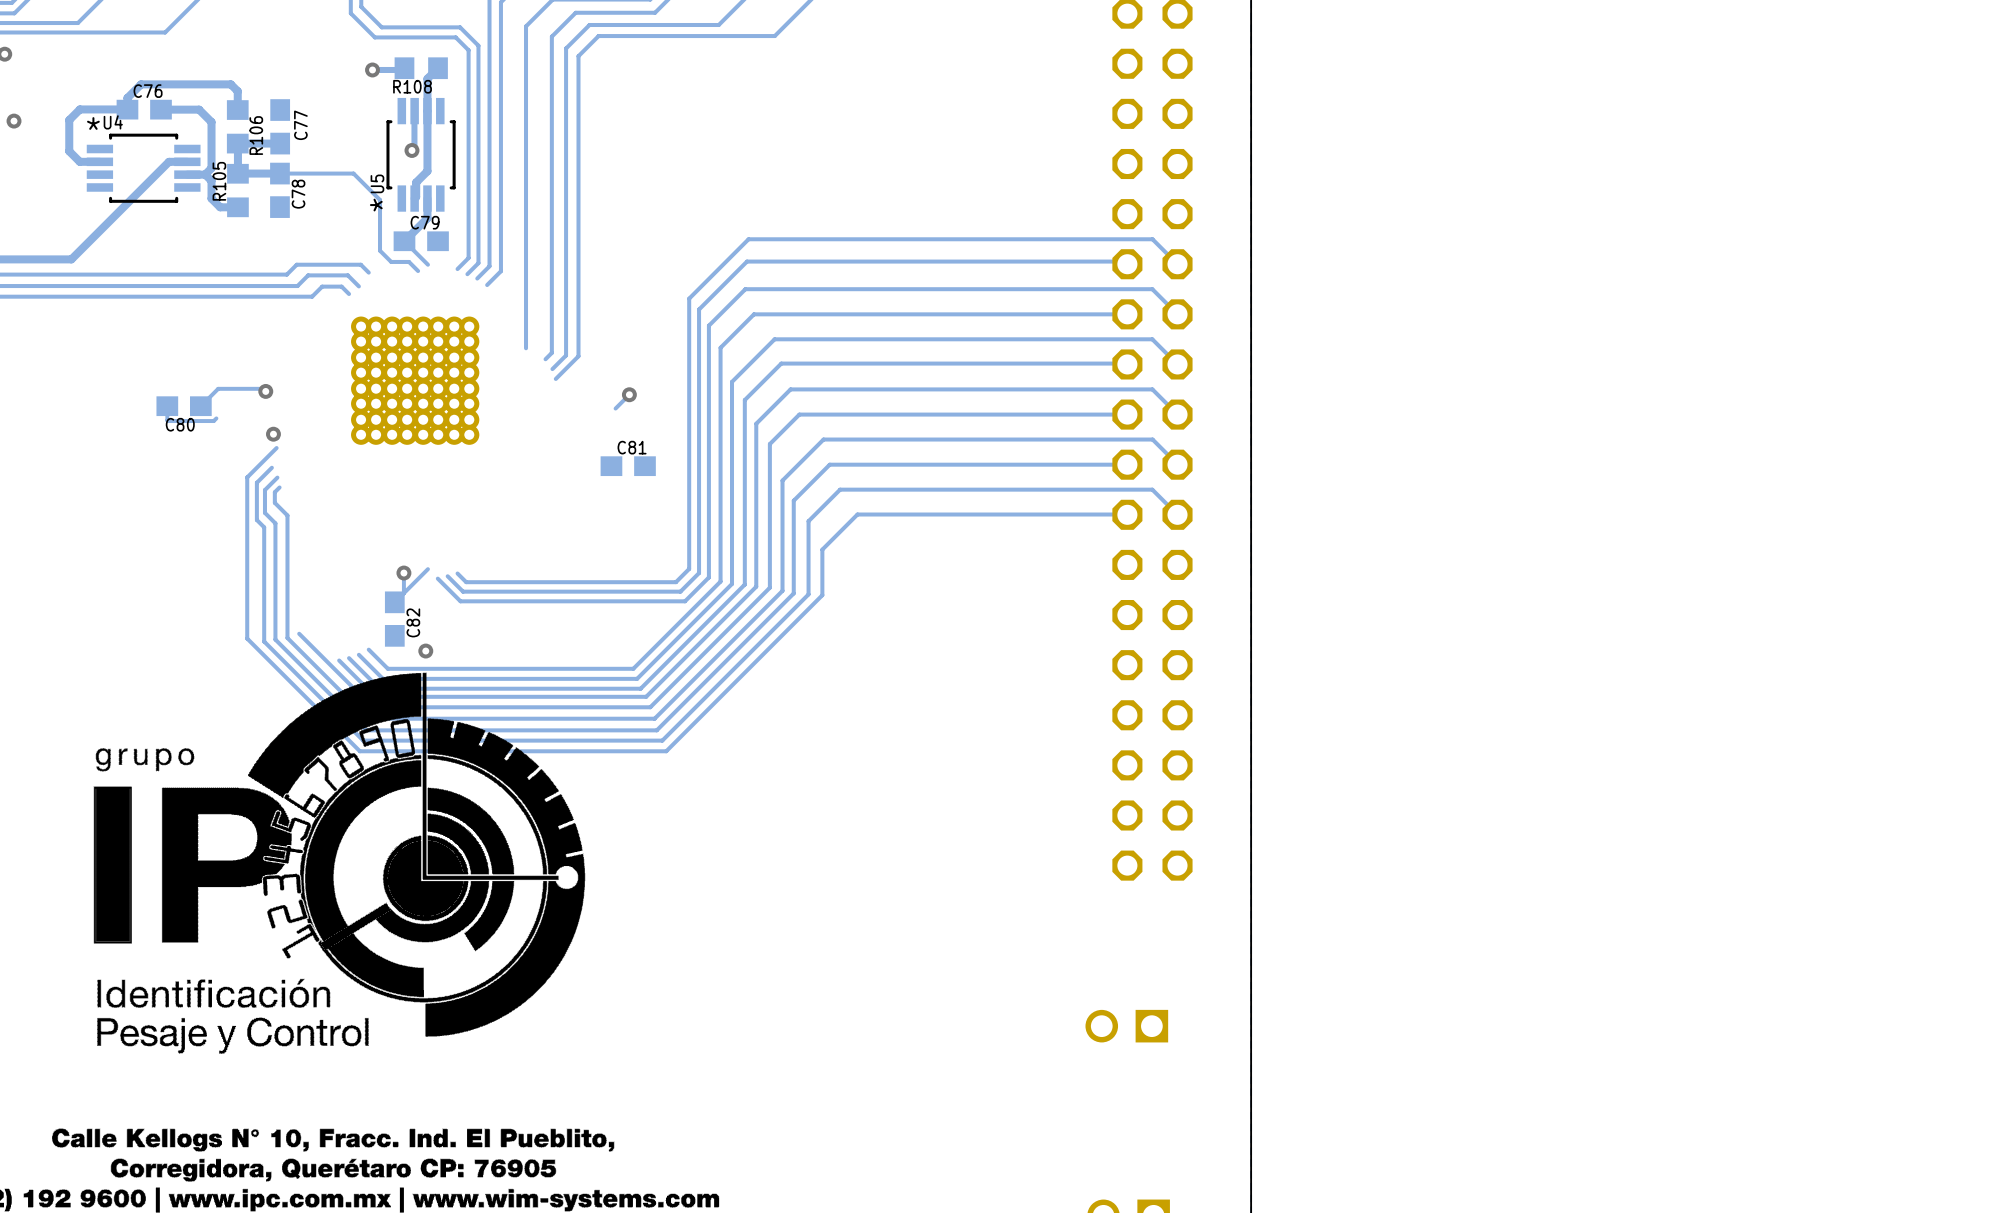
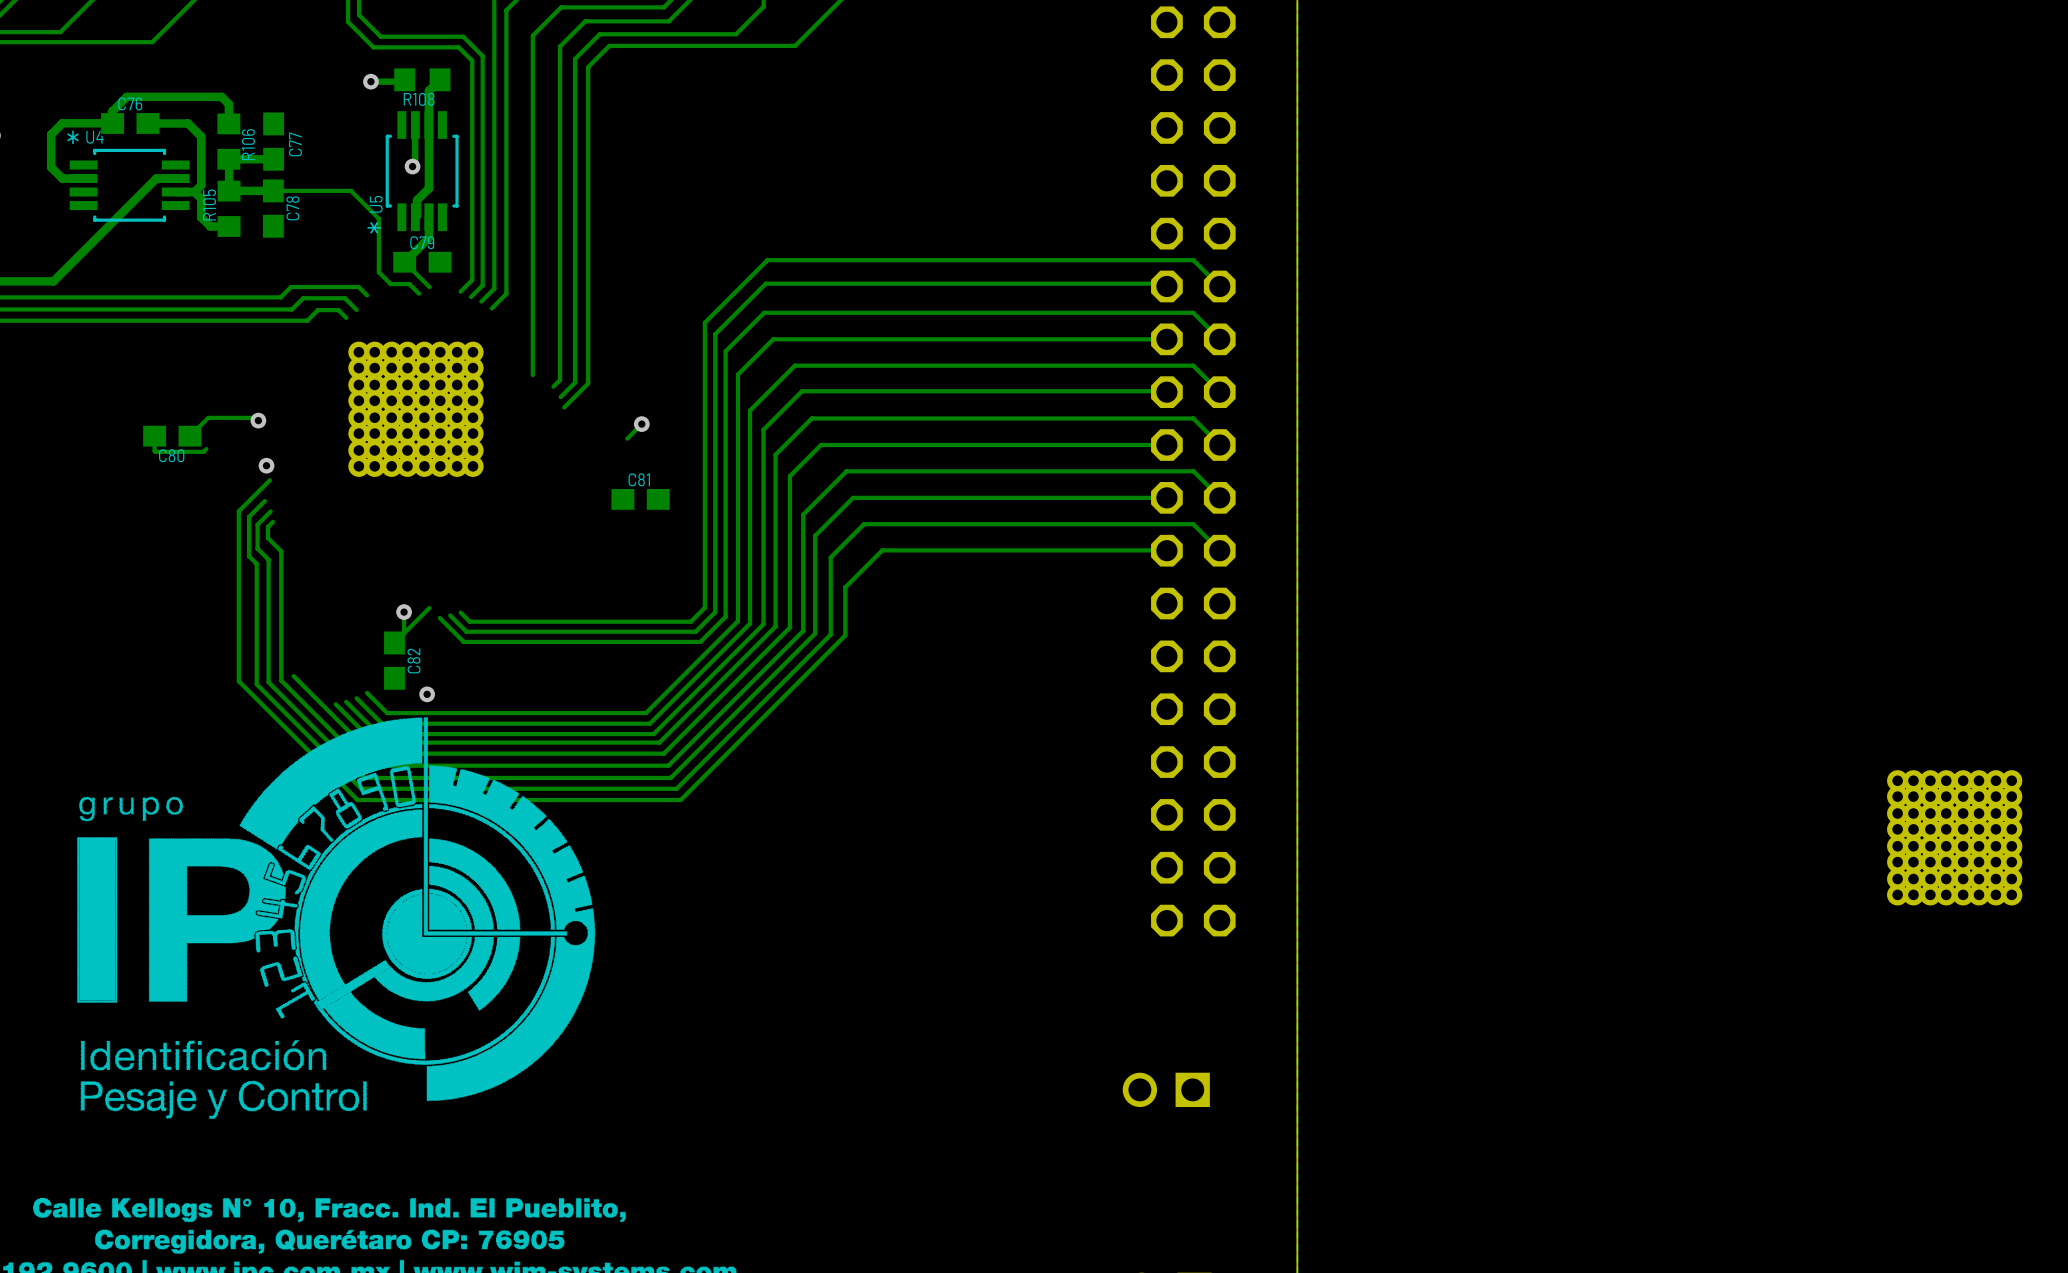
part: none -> (1954, 837)

